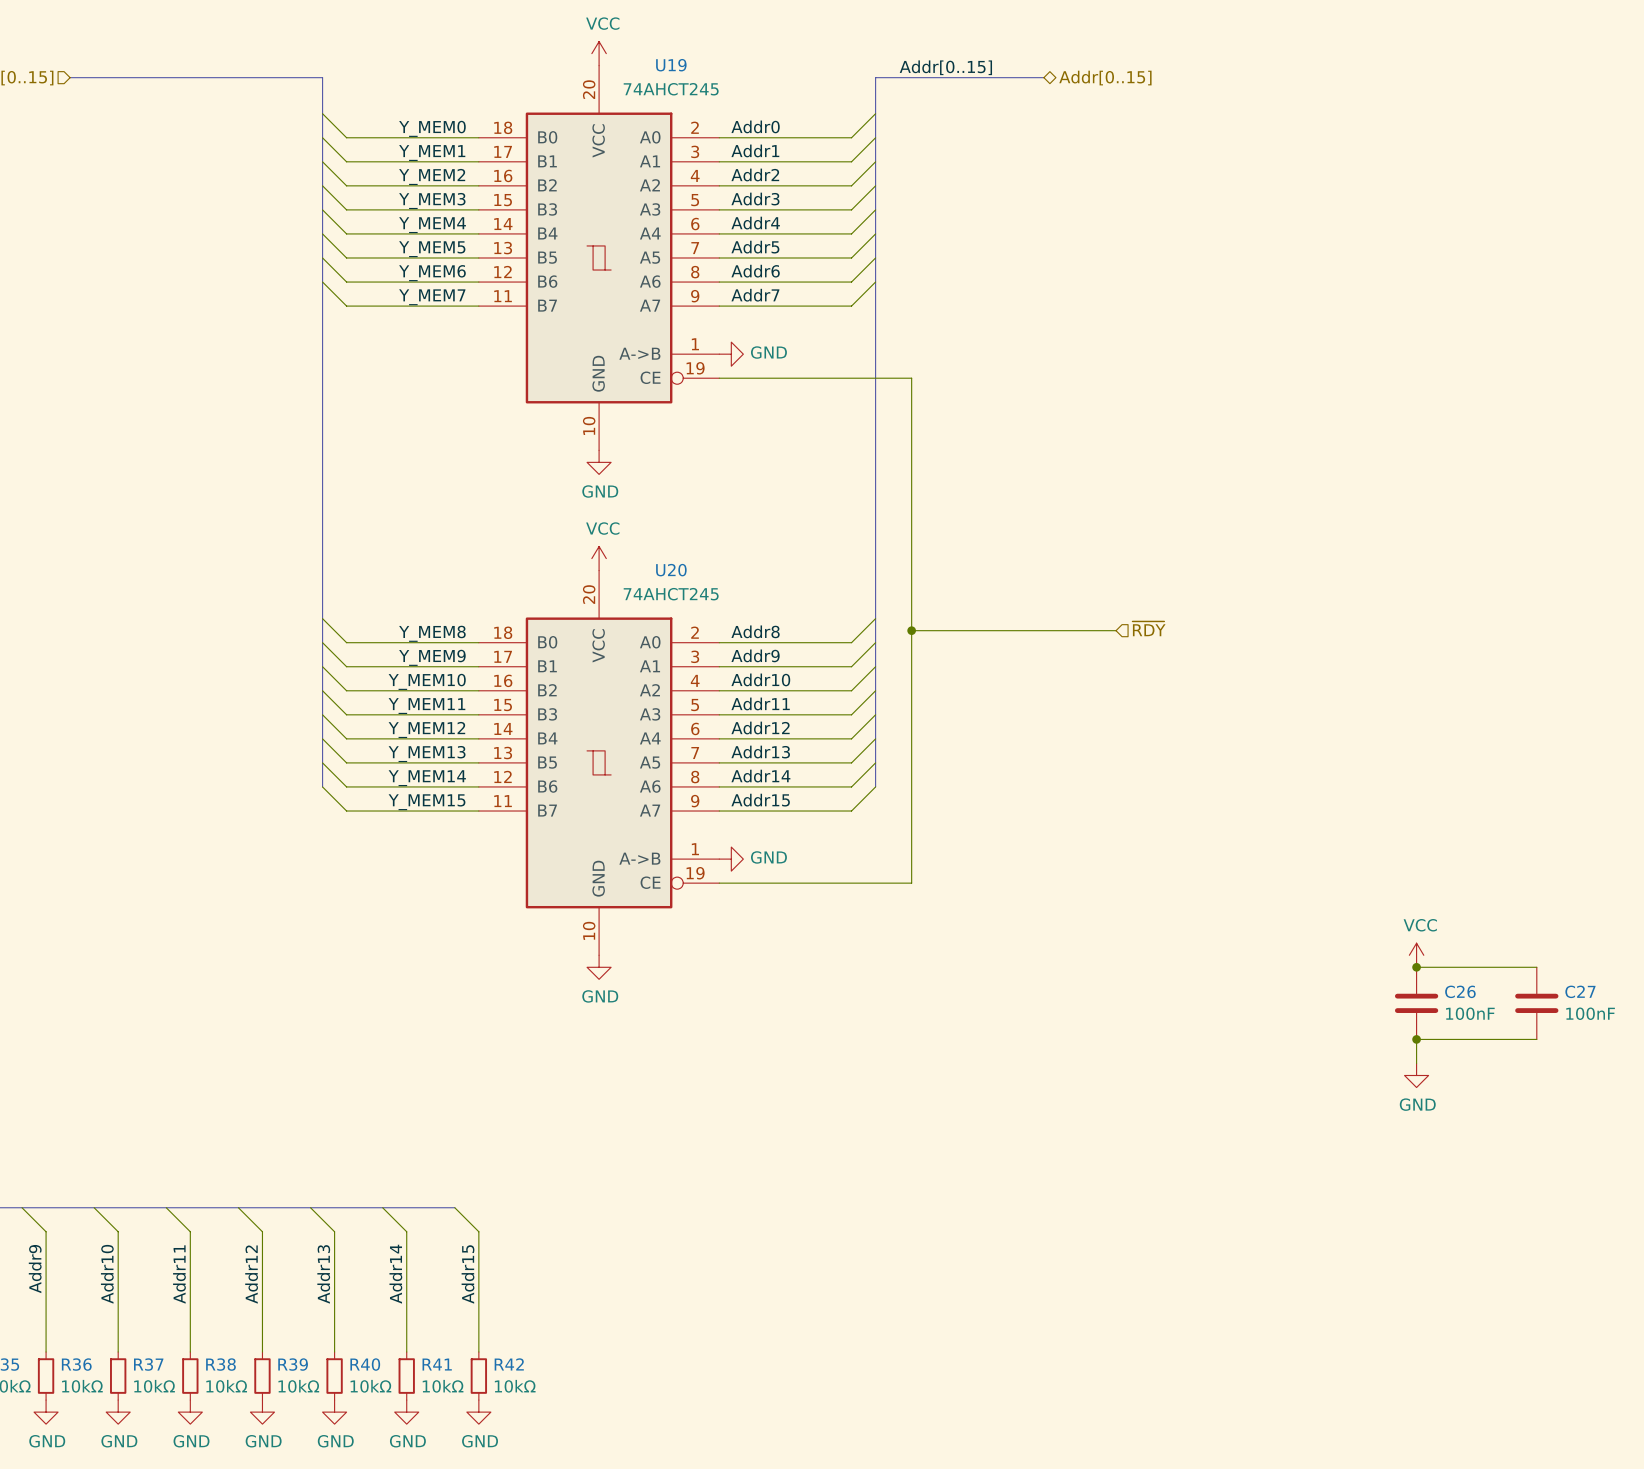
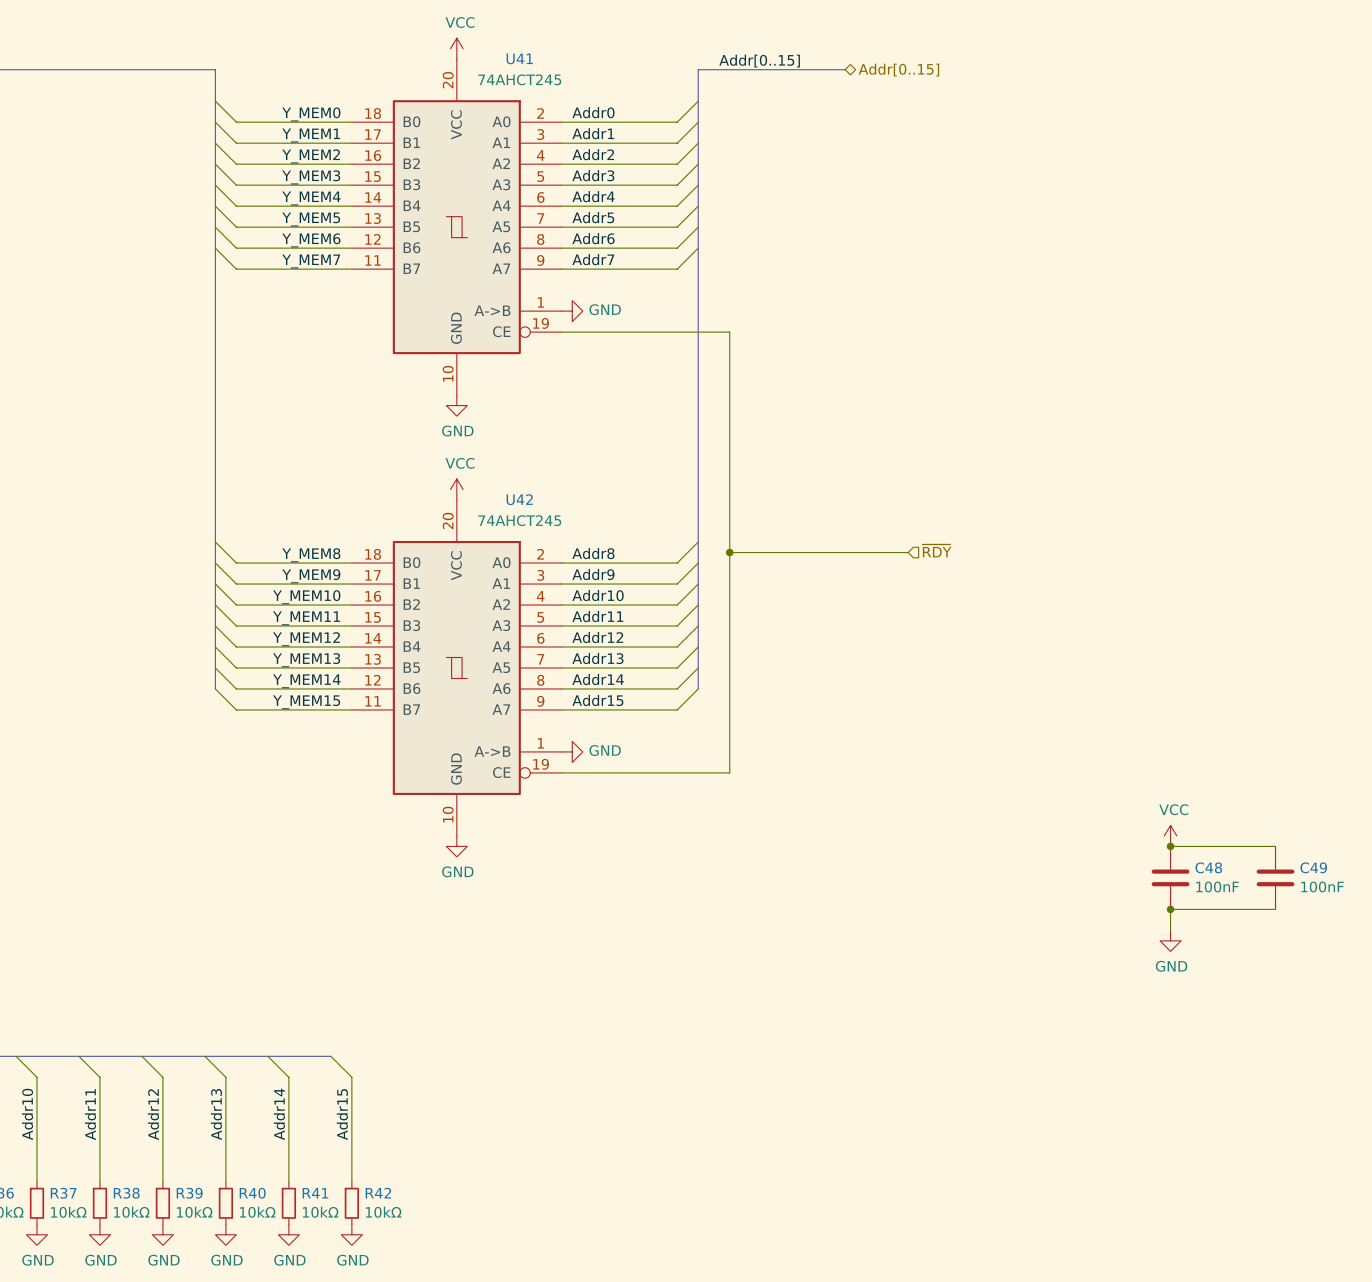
U19 name: U19 (671, 65) -> U41 (519, 58)
U20 name: U20 (671, 570) -> U42 (519, 499)
C26 name: C26 (1460, 991) -> C48 (1208, 867)
C27 name: C27 (1580, 991) -> C49 (1313, 867)

